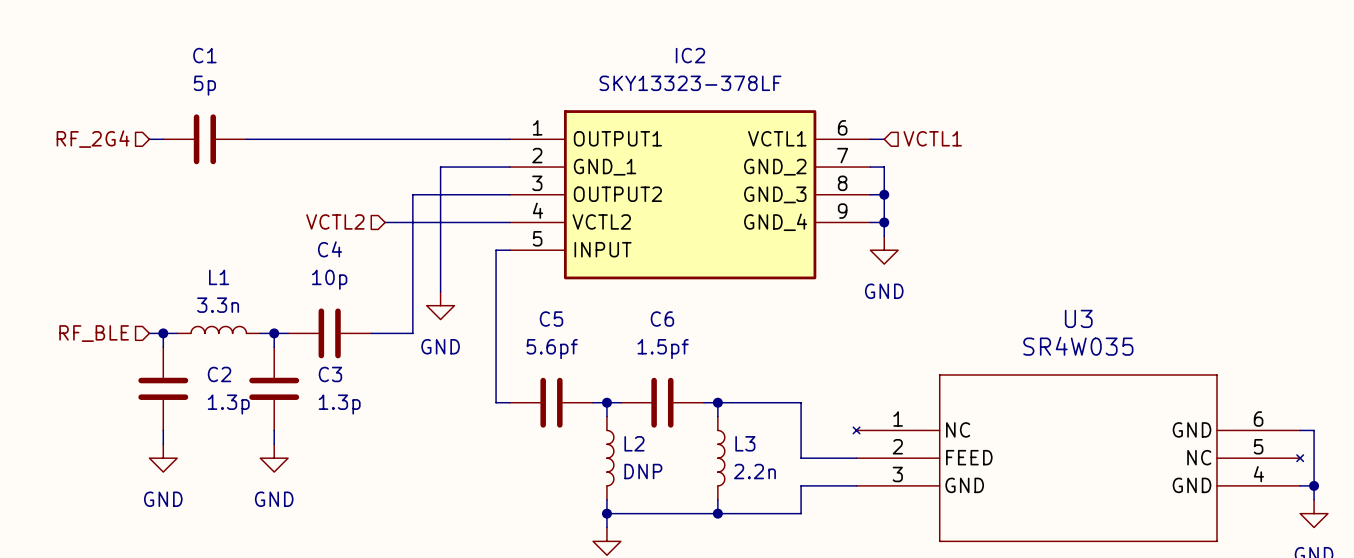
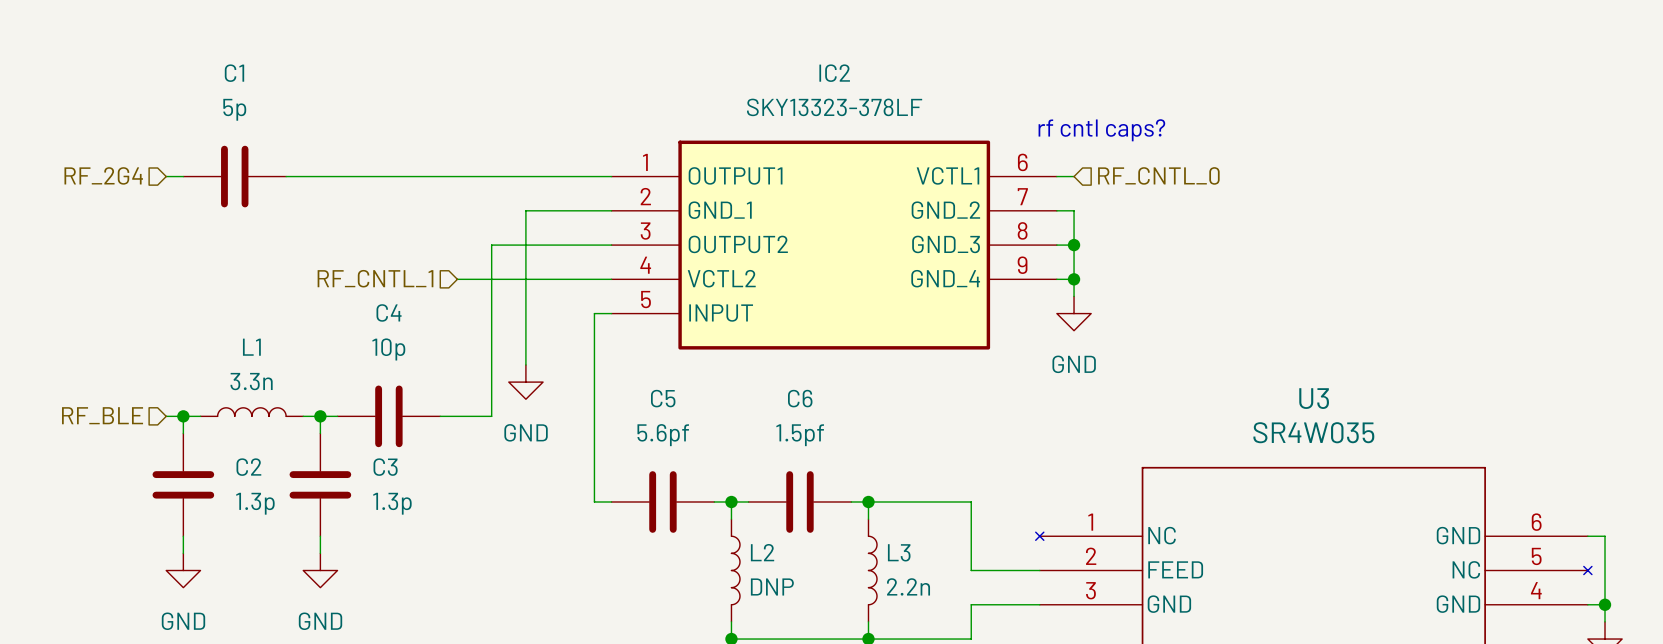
text: none -> rf cntl caps? (1101, 130)
hierarchical label: VCTL1 (932, 138) -> RF_CNTL_0 (1158, 175)
hierarchical label: VCTL2 (335, 221) -> RF_CNTL_1 (375, 278)

